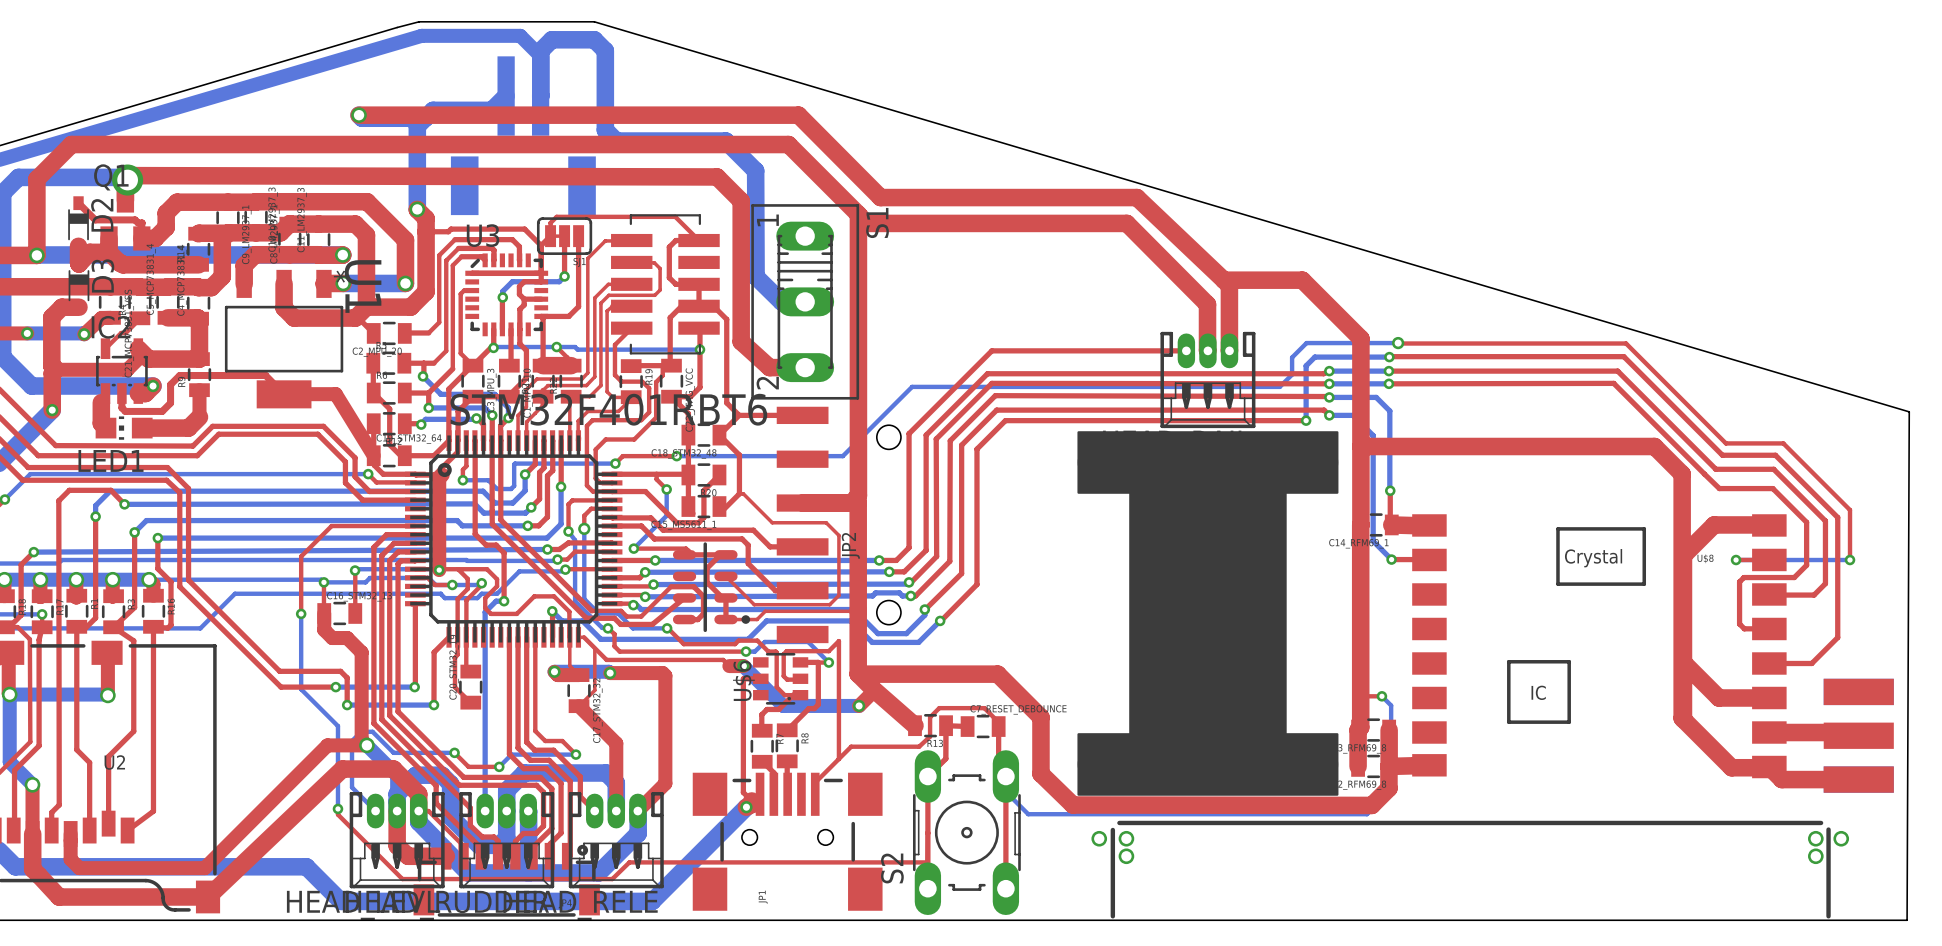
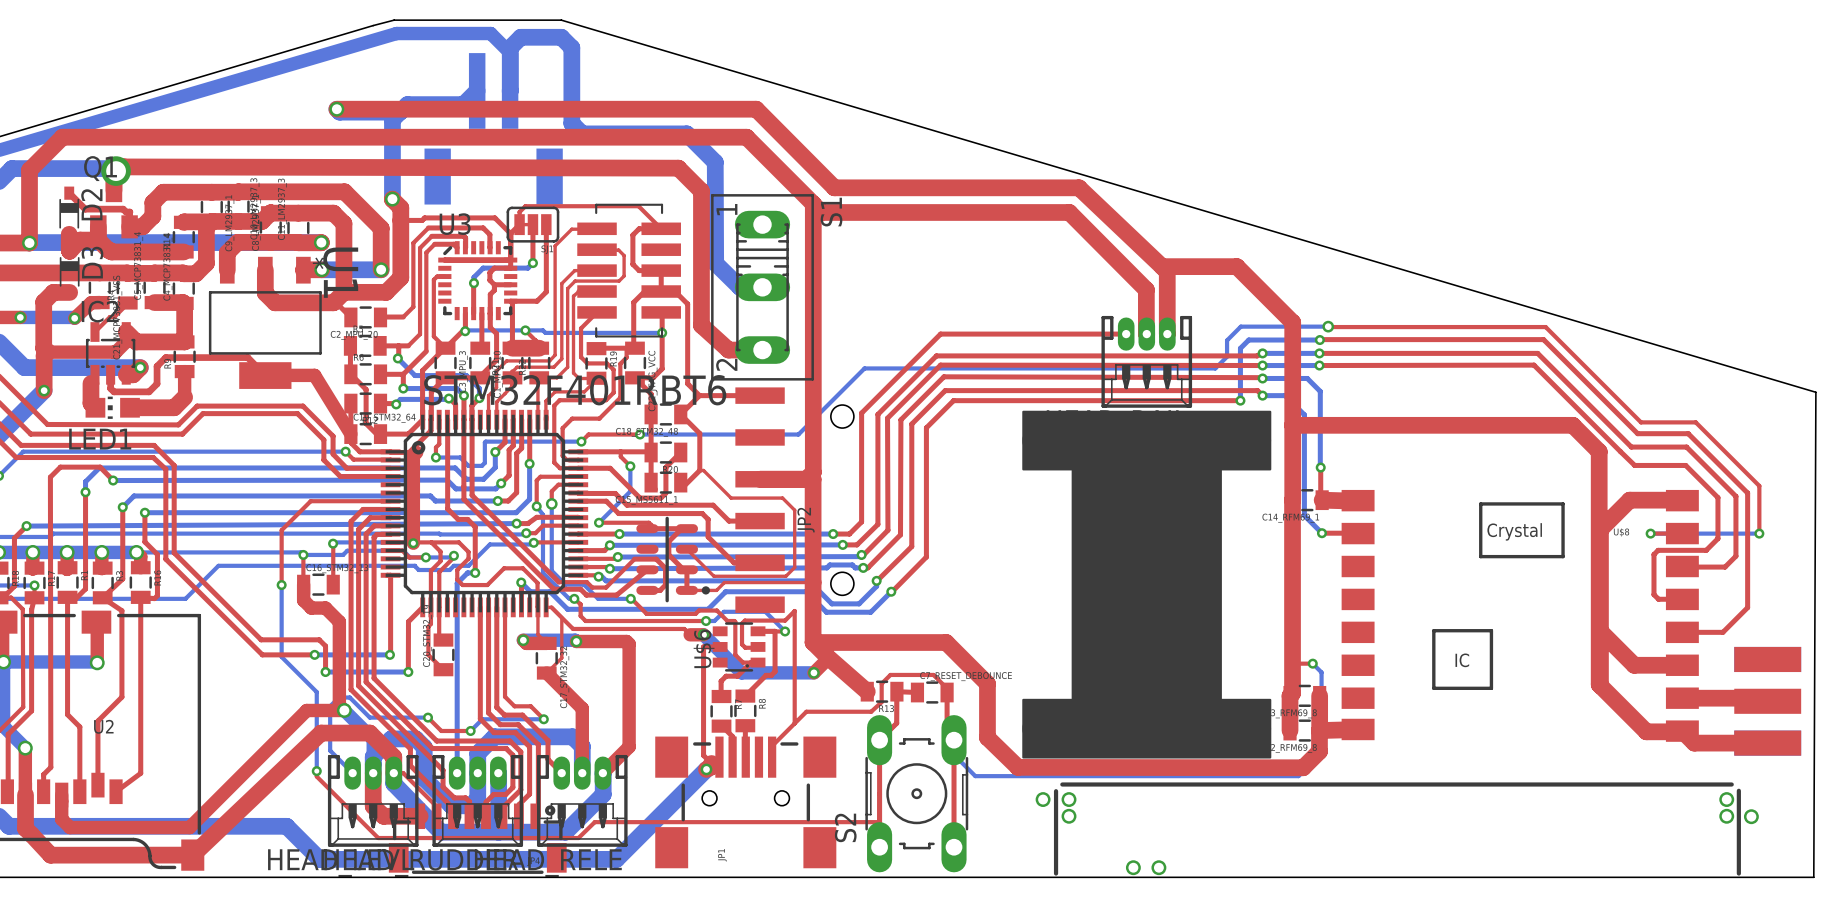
via position: (1841, 838) -> (1751, 816)
via: none -> (1133, 867)
via: none -> (1158, 867)

